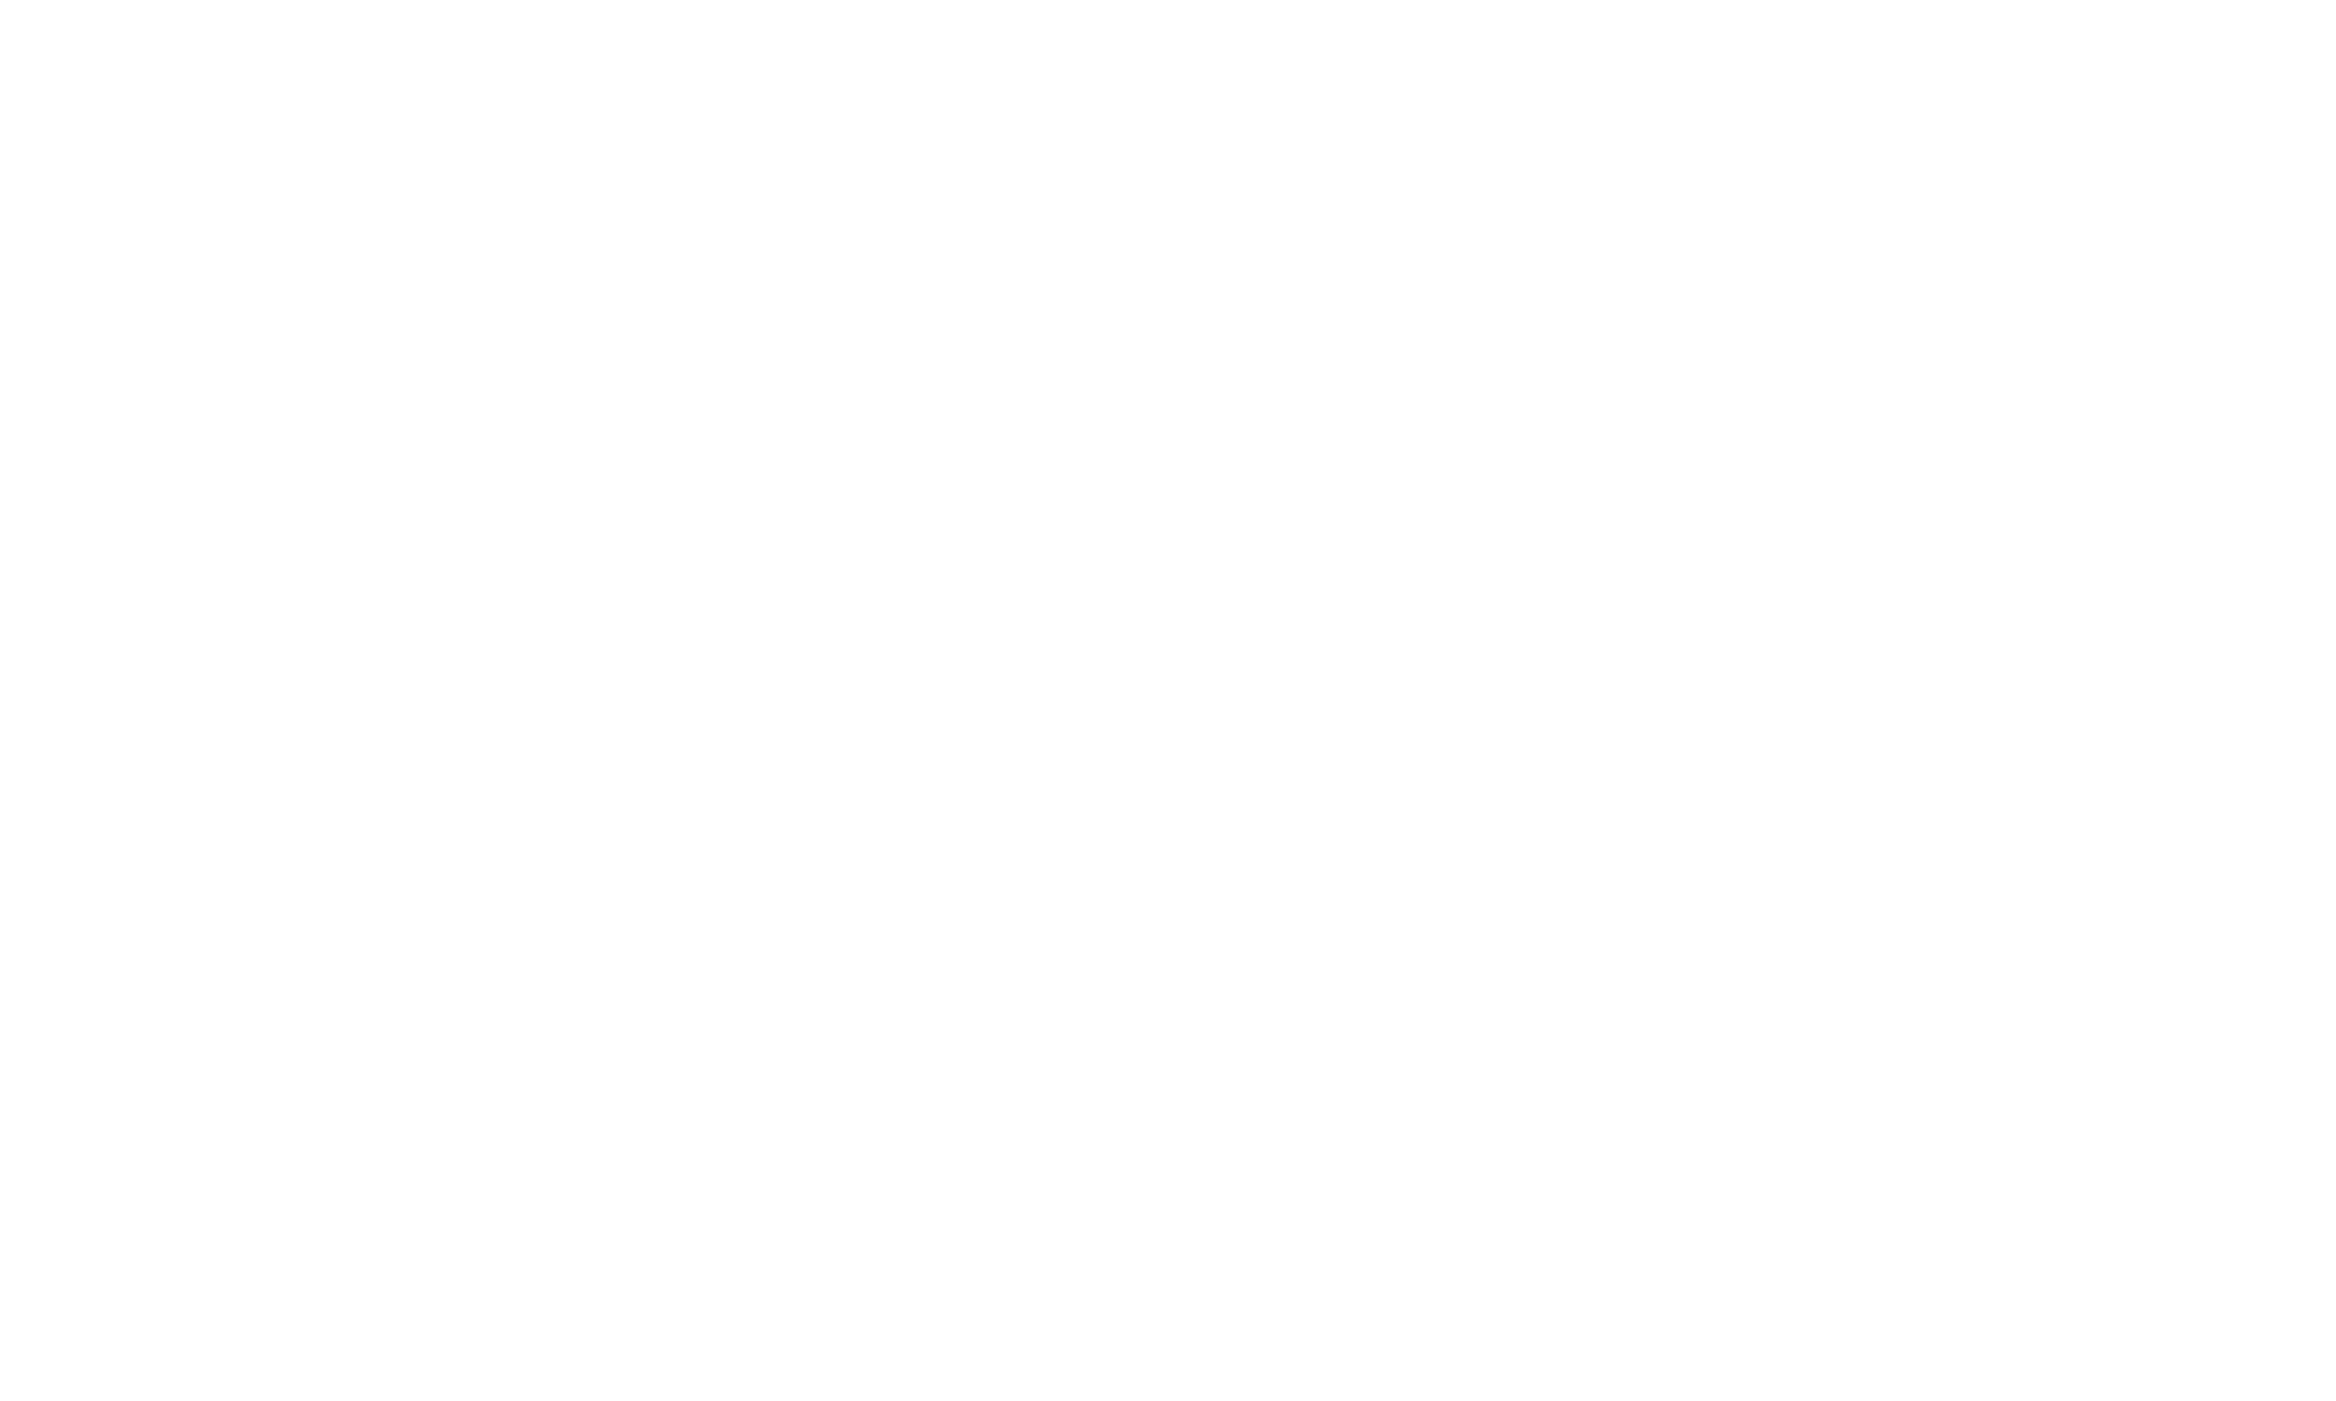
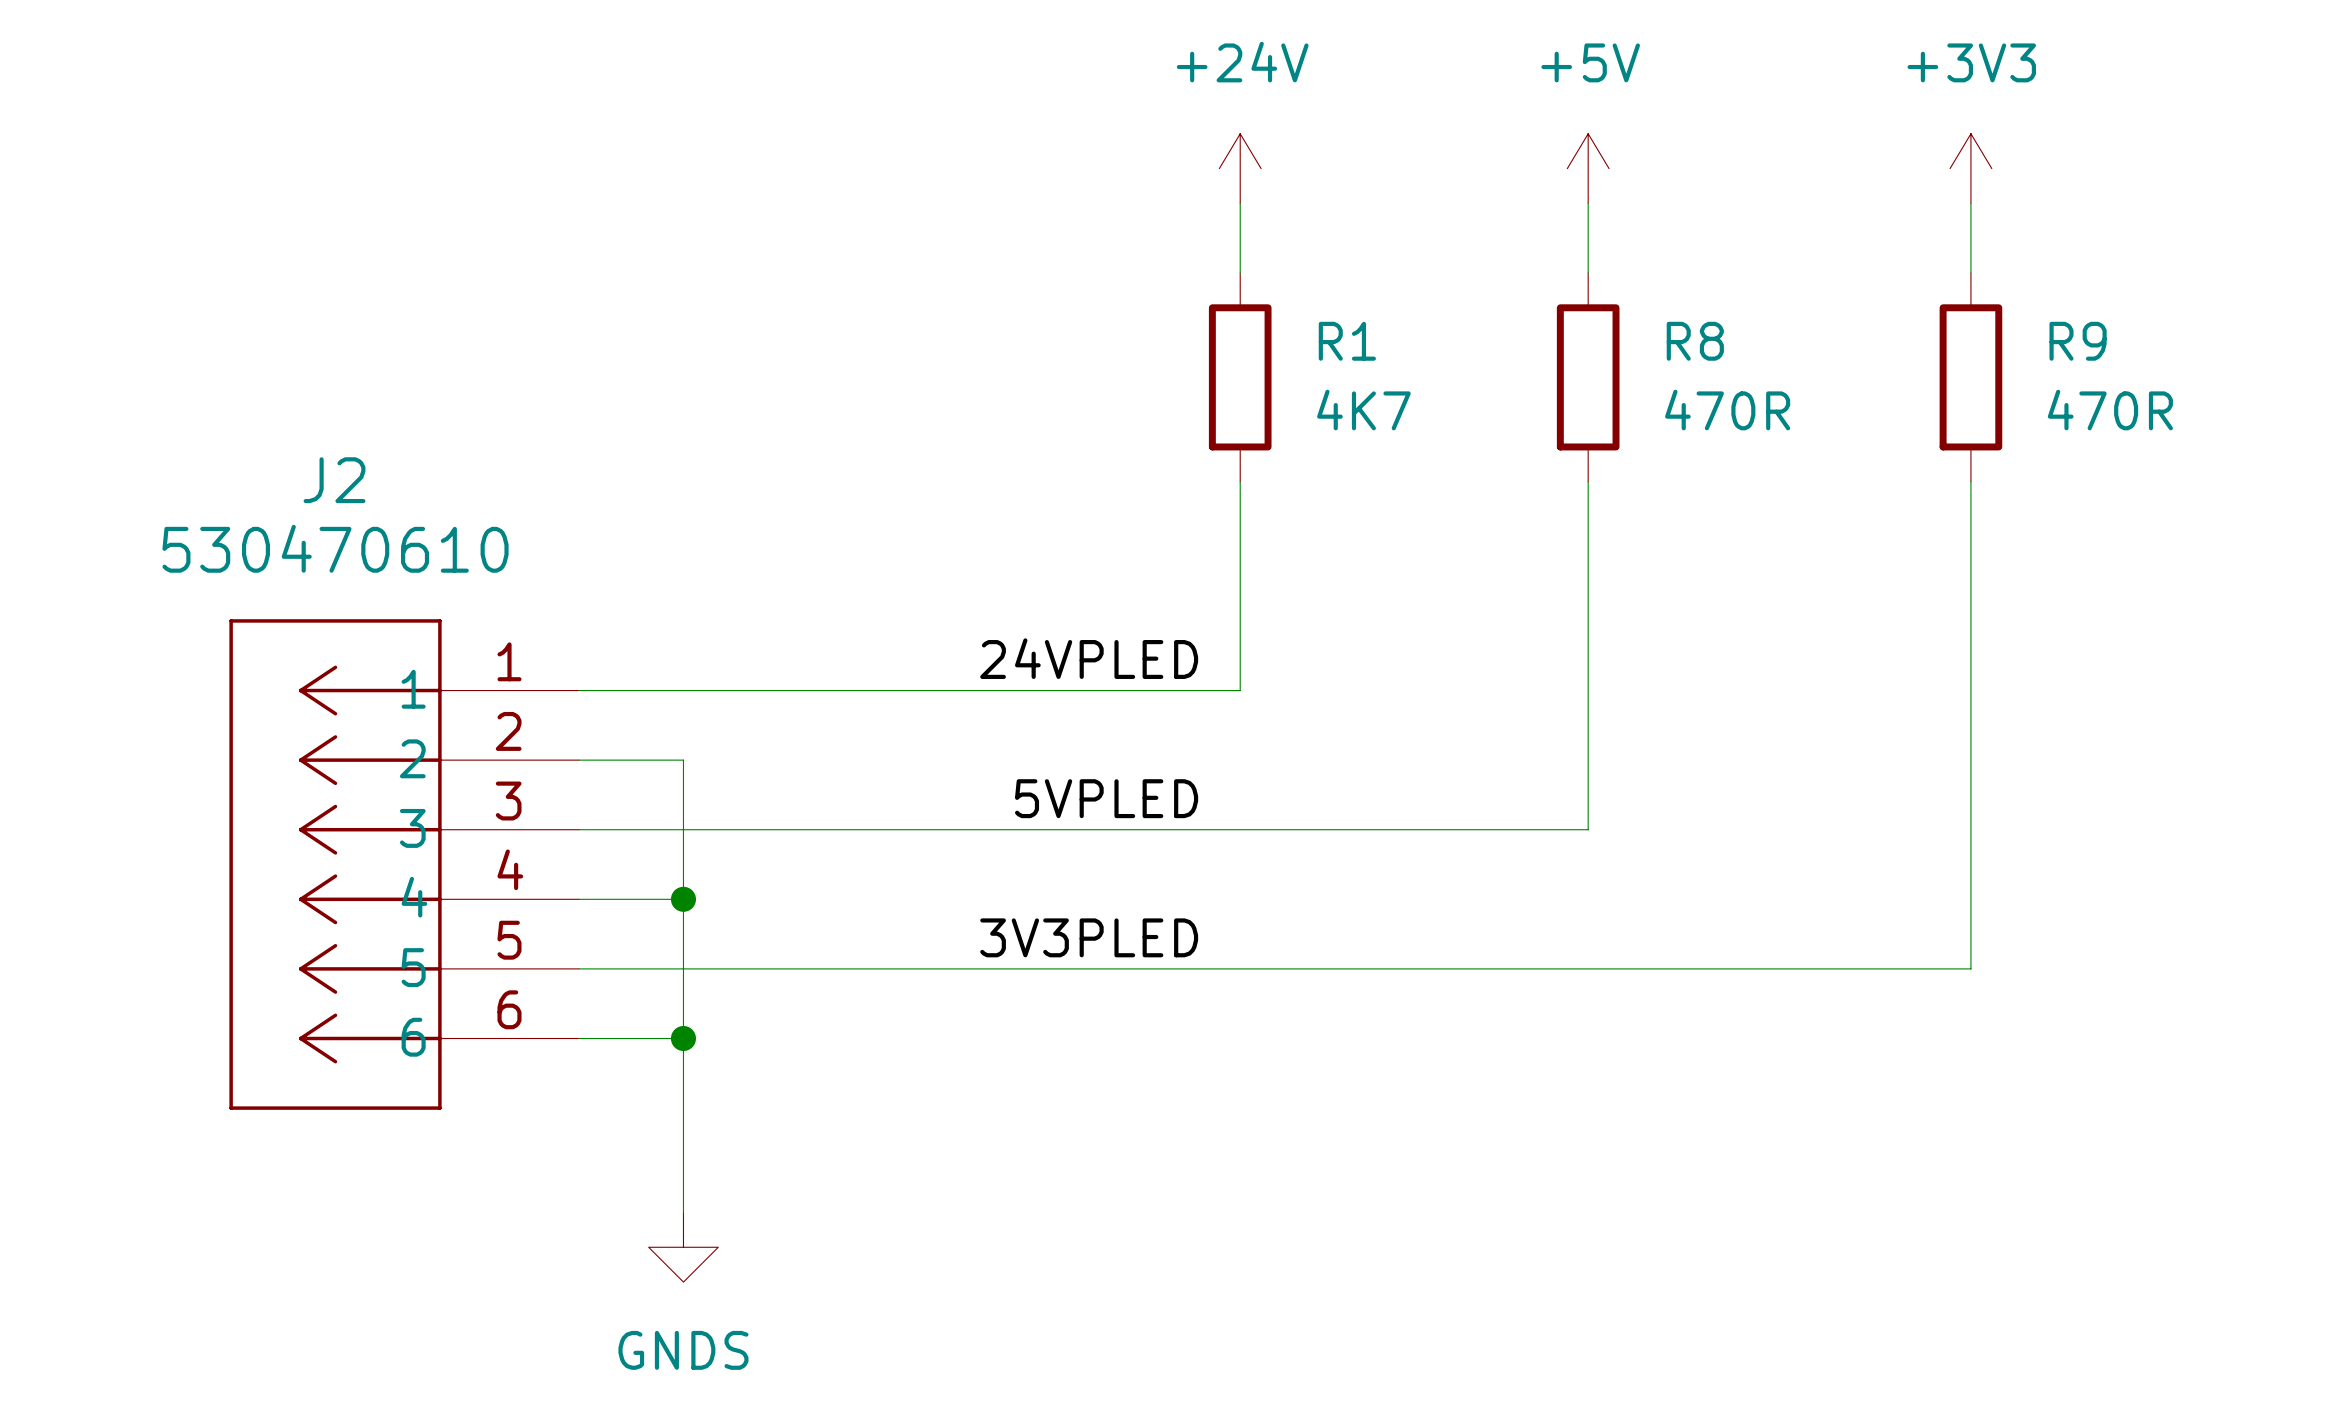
power symbol: none -> +24V (1240, 168)
power symbol: none -> +5V (1588, 168)
power symbol: none -> +3V3 (1970, 168)
wire: none -> (1240, 203) (1240, 272)
wire: none -> (1588, 203) (1588, 272)
wire: none -> (1970, 203) (1970, 272)
R1: none -> 4K7 (1240, 377)
R8: none -> 470R (1588, 377)
R9: none -> 470R (1970, 377)
wire: none -> (1240, 481) (1240, 690) (579, 690)
wire: none -> (1588, 481) (1588, 829) (579, 829)
wire: none -> (1970, 481) (1970, 968) (579, 968)
label: none -> 24VPLED (1089, 658)
wire: none -> (579, 760) (683, 760) (683, 1212)
label: none -> 5VPLED (1106, 798)
J2: none -> 530470610 (404, 864)
wire: none -> (579, 899) (683, 899)
junction: none -> (683, 899)
label: none -> 3V3PLED (1089, 937)
wire: none -> (579, 1038) (683, 1038)
junction: none -> (683, 1038)
power symbol: none -> GNDS (683, 1247)

